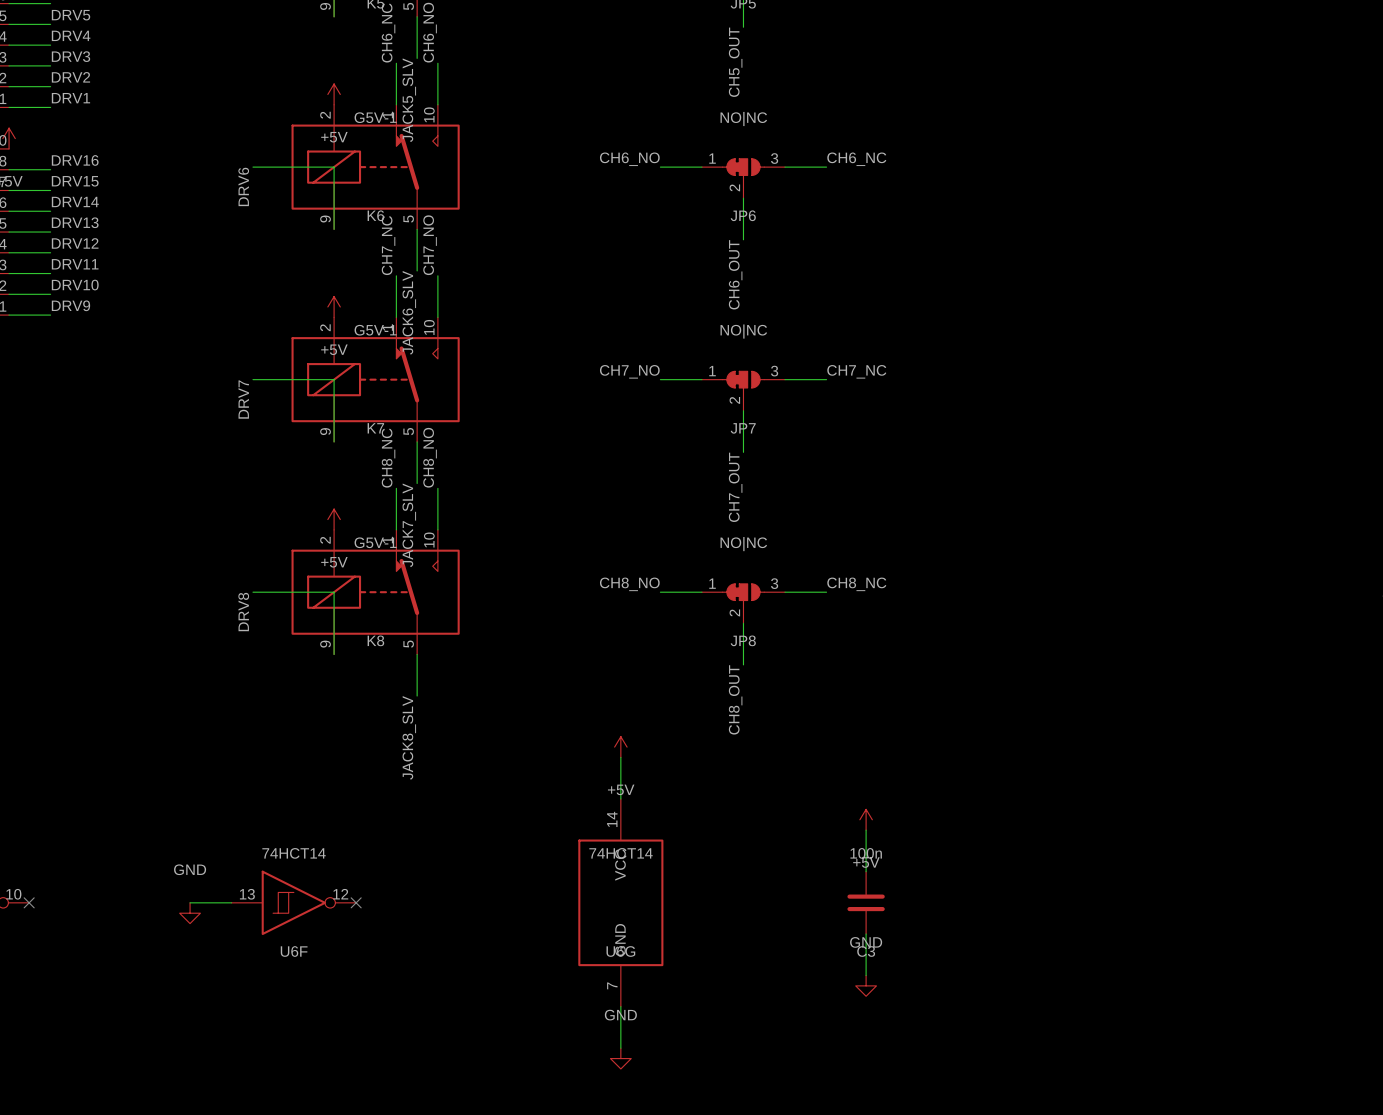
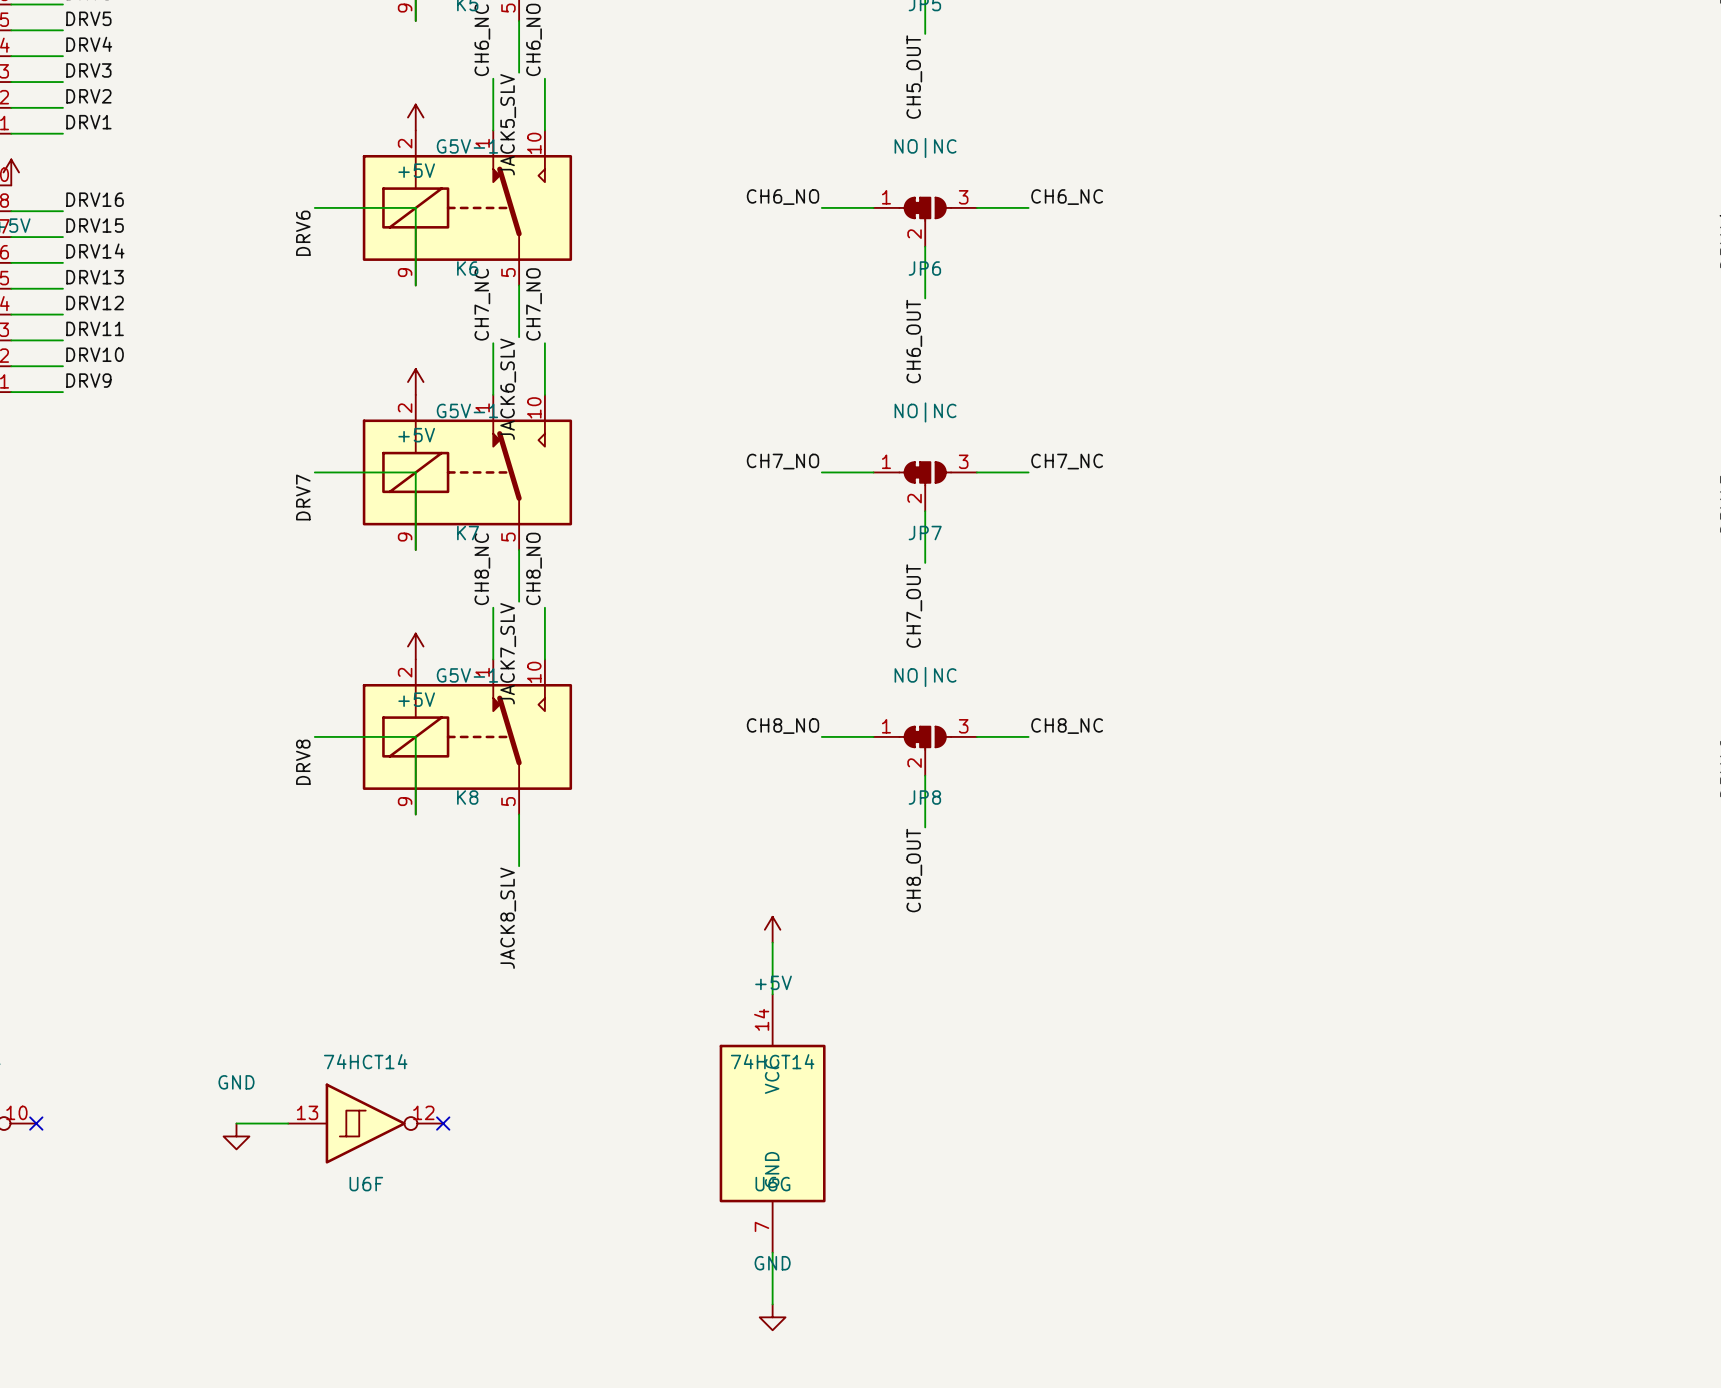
power symbol: +5V (866, 819) -> none
wire: (866, 830) (866, 871) -> none
C3: 100n (866, 902) -> none
wire: (866, 933) (866, 975) -> none
power symbol: GND (866, 985) -> none

